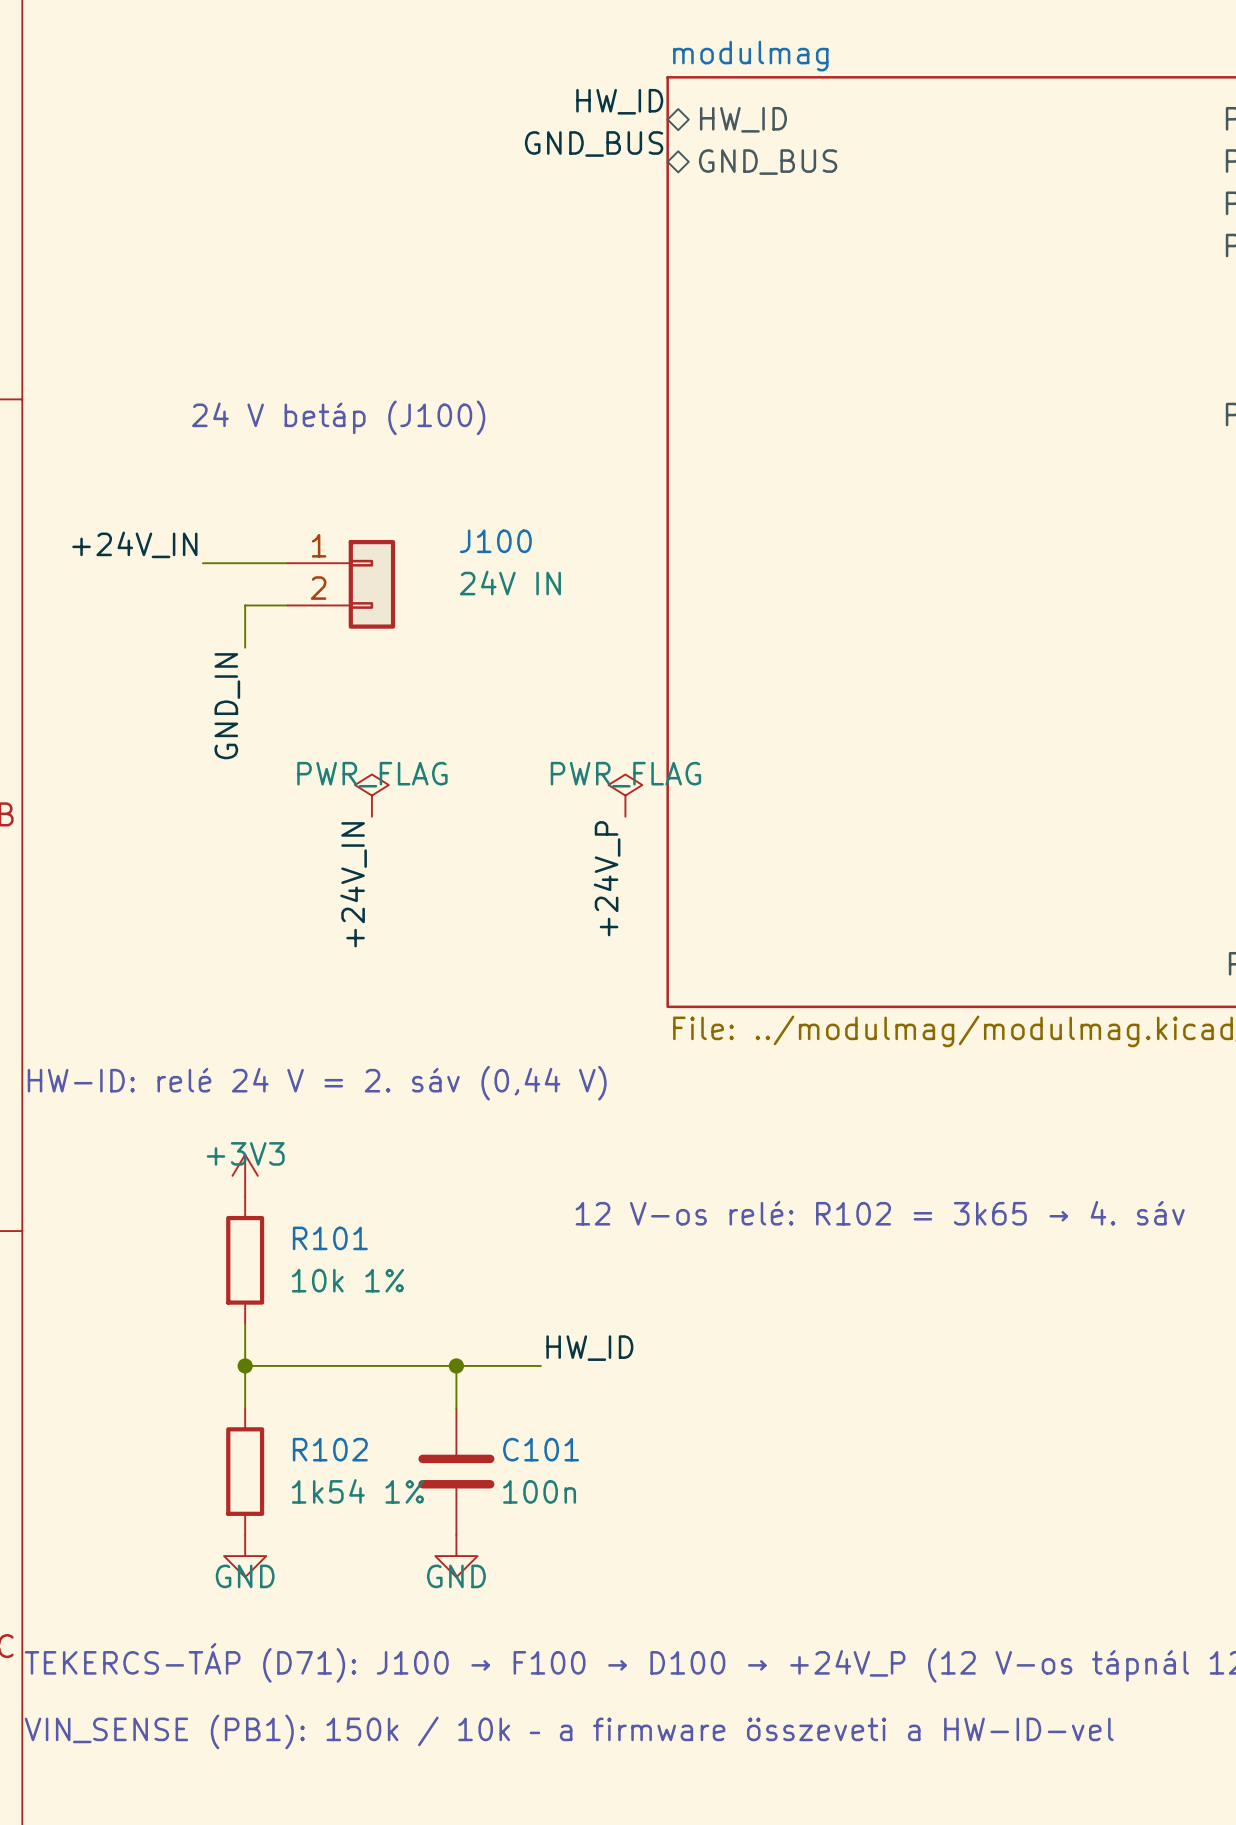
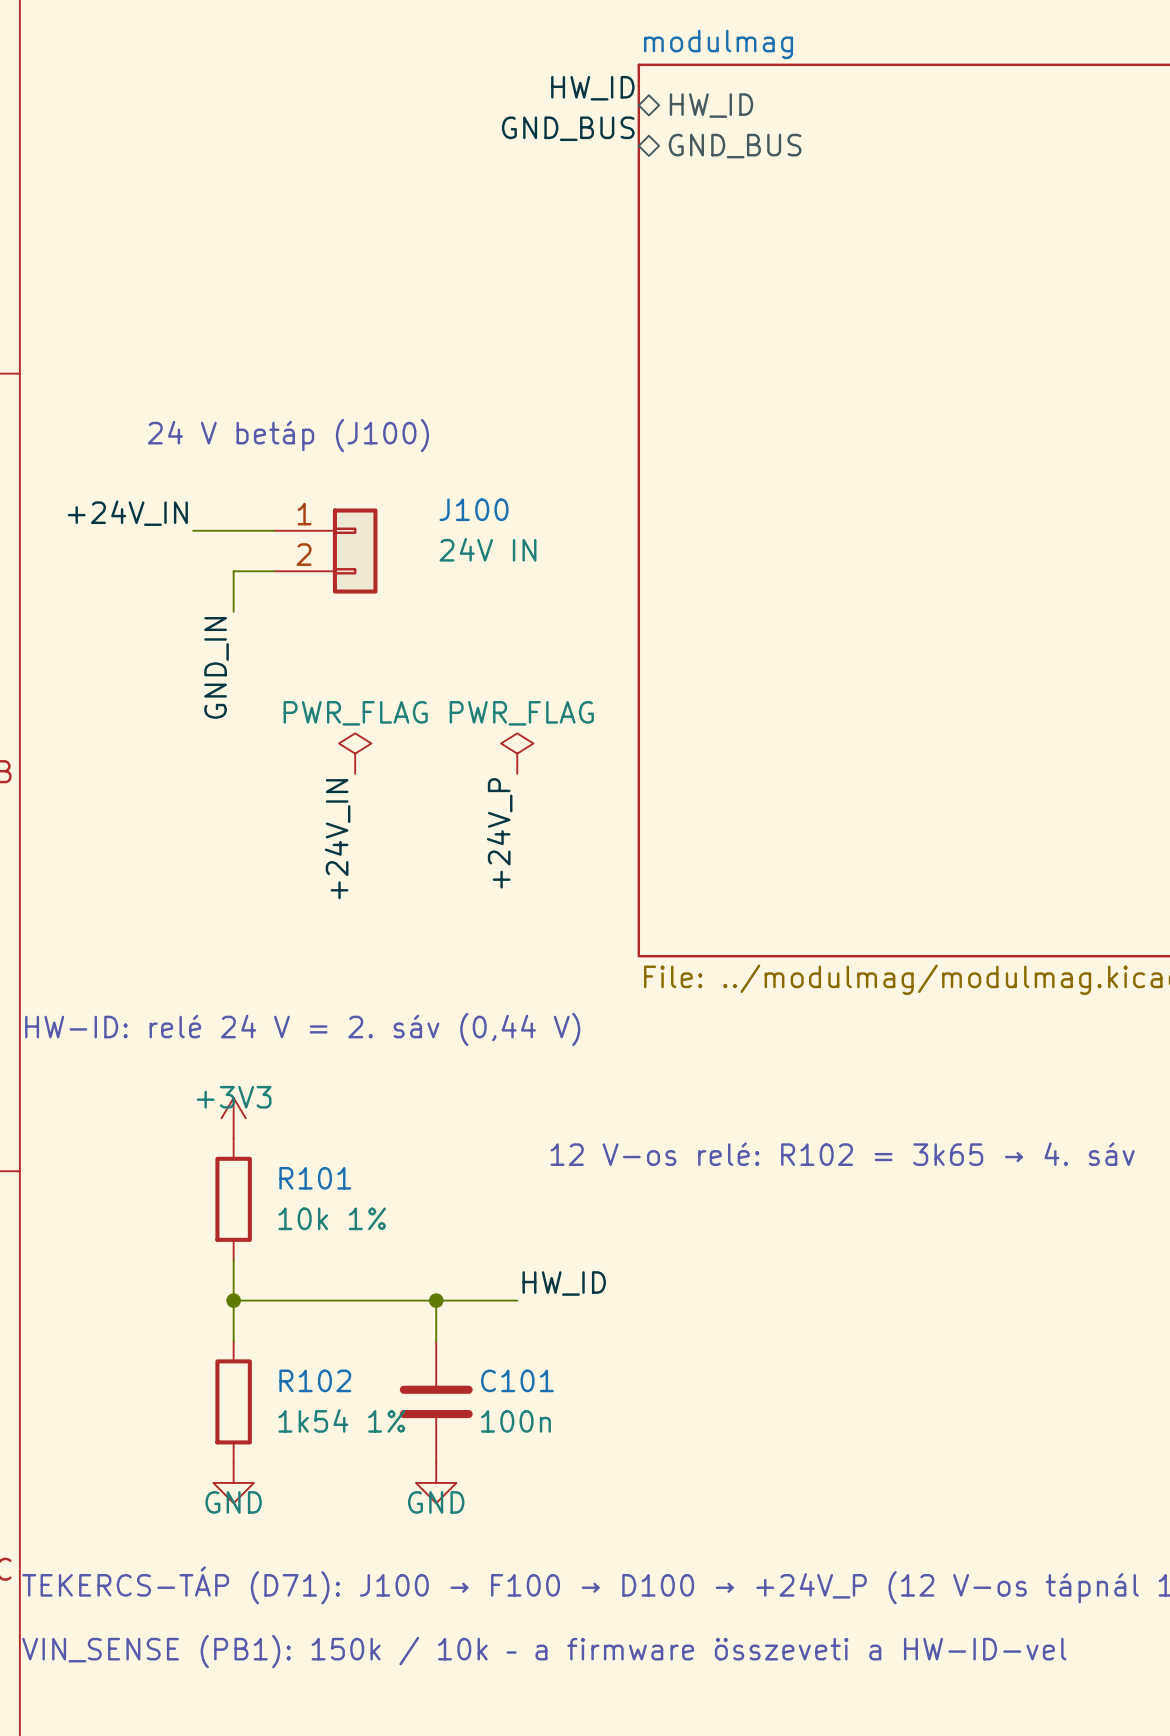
text position: 24 V betáp (J100) (338, 417) -> 24 V betáp (J100) (288, 435)
power symbol text position: PWR_FLAG (372, 774) -> PWR_FLAG (355, 713)
power symbol text position: PWR_FLAG (625, 774) -> PWR_FLAG (521, 713)
power symbol position: PWR_FLAG (625, 795) -> PWR_FLAG (517, 753)
label position: +24V_P (607, 878) -> +24V_P (499, 833)

